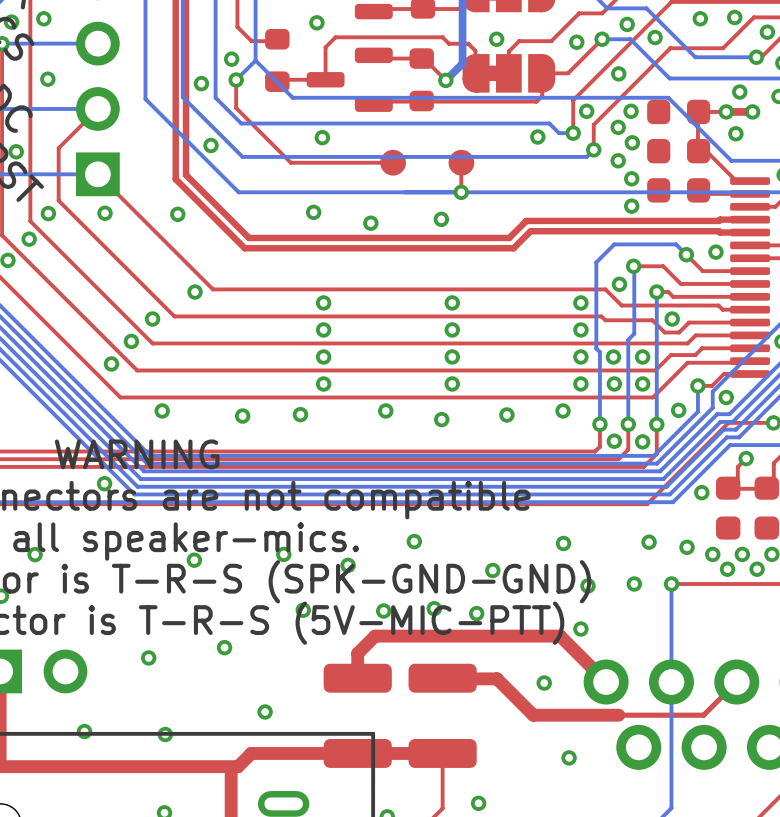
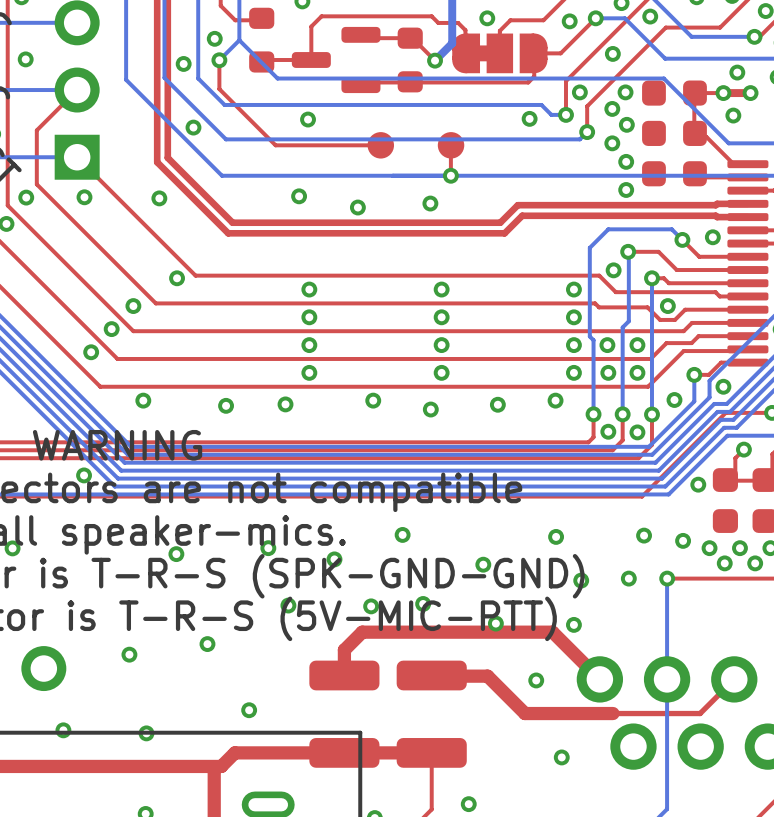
via position: (476, 613) -> (495, 623)

